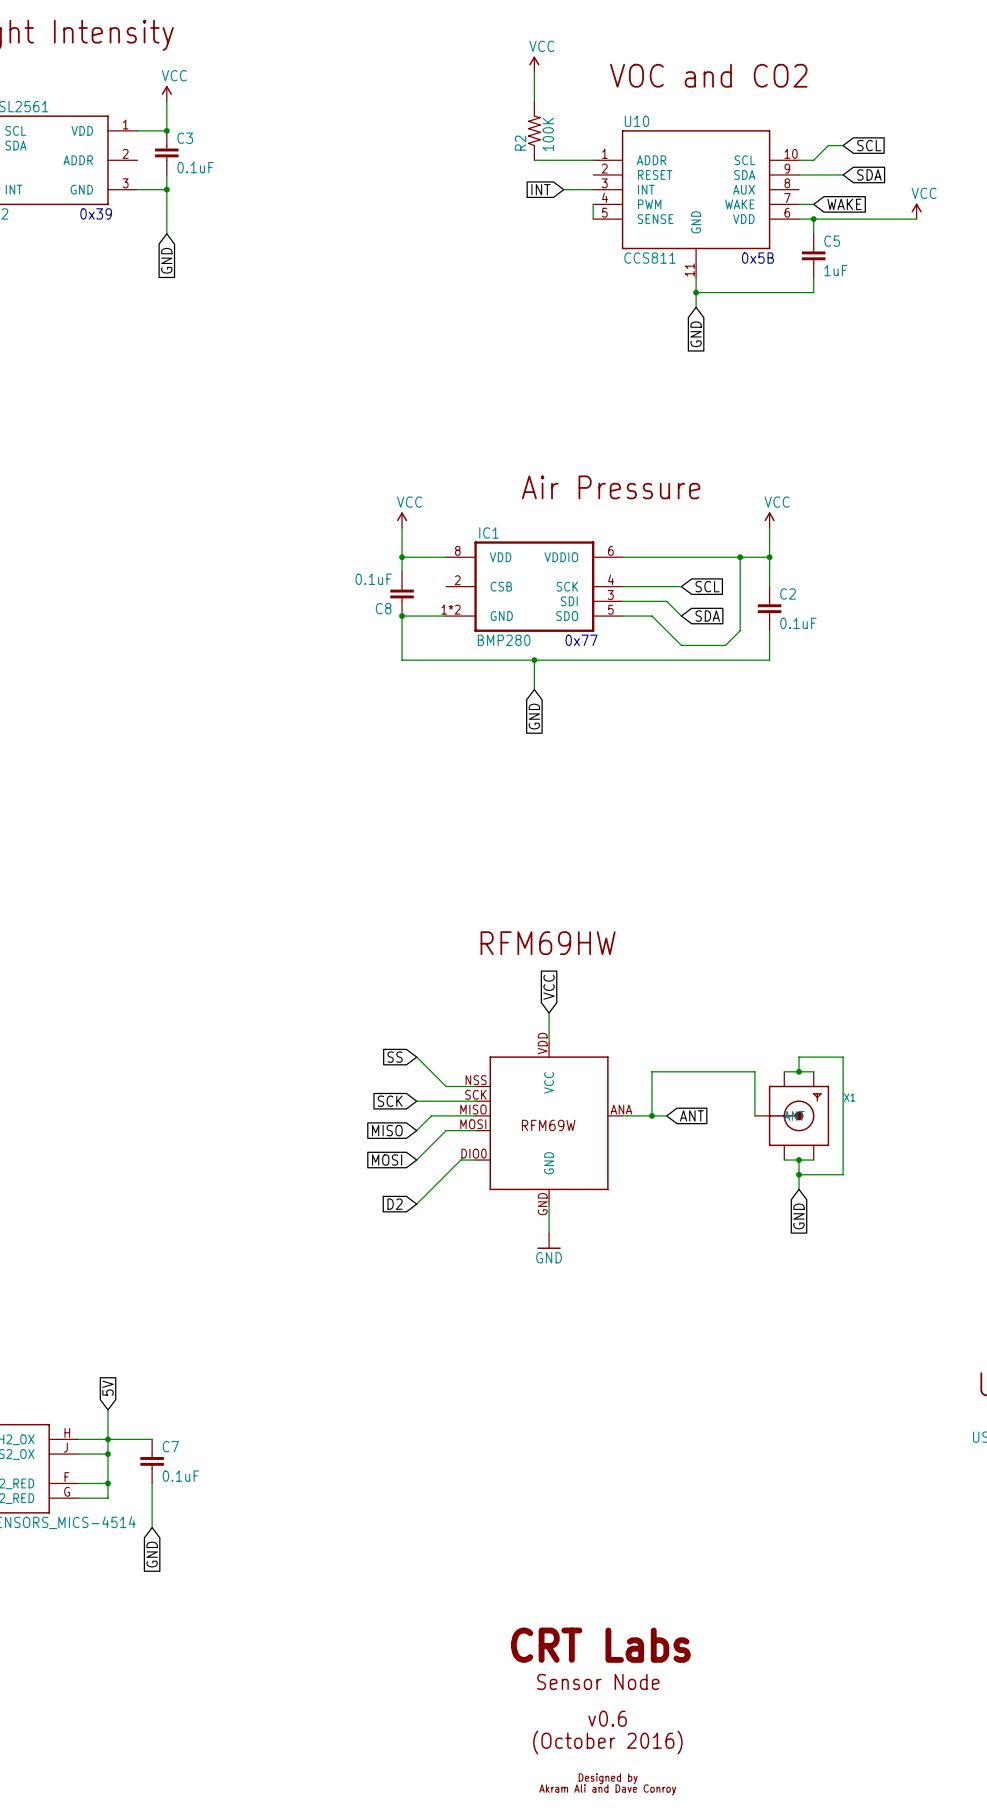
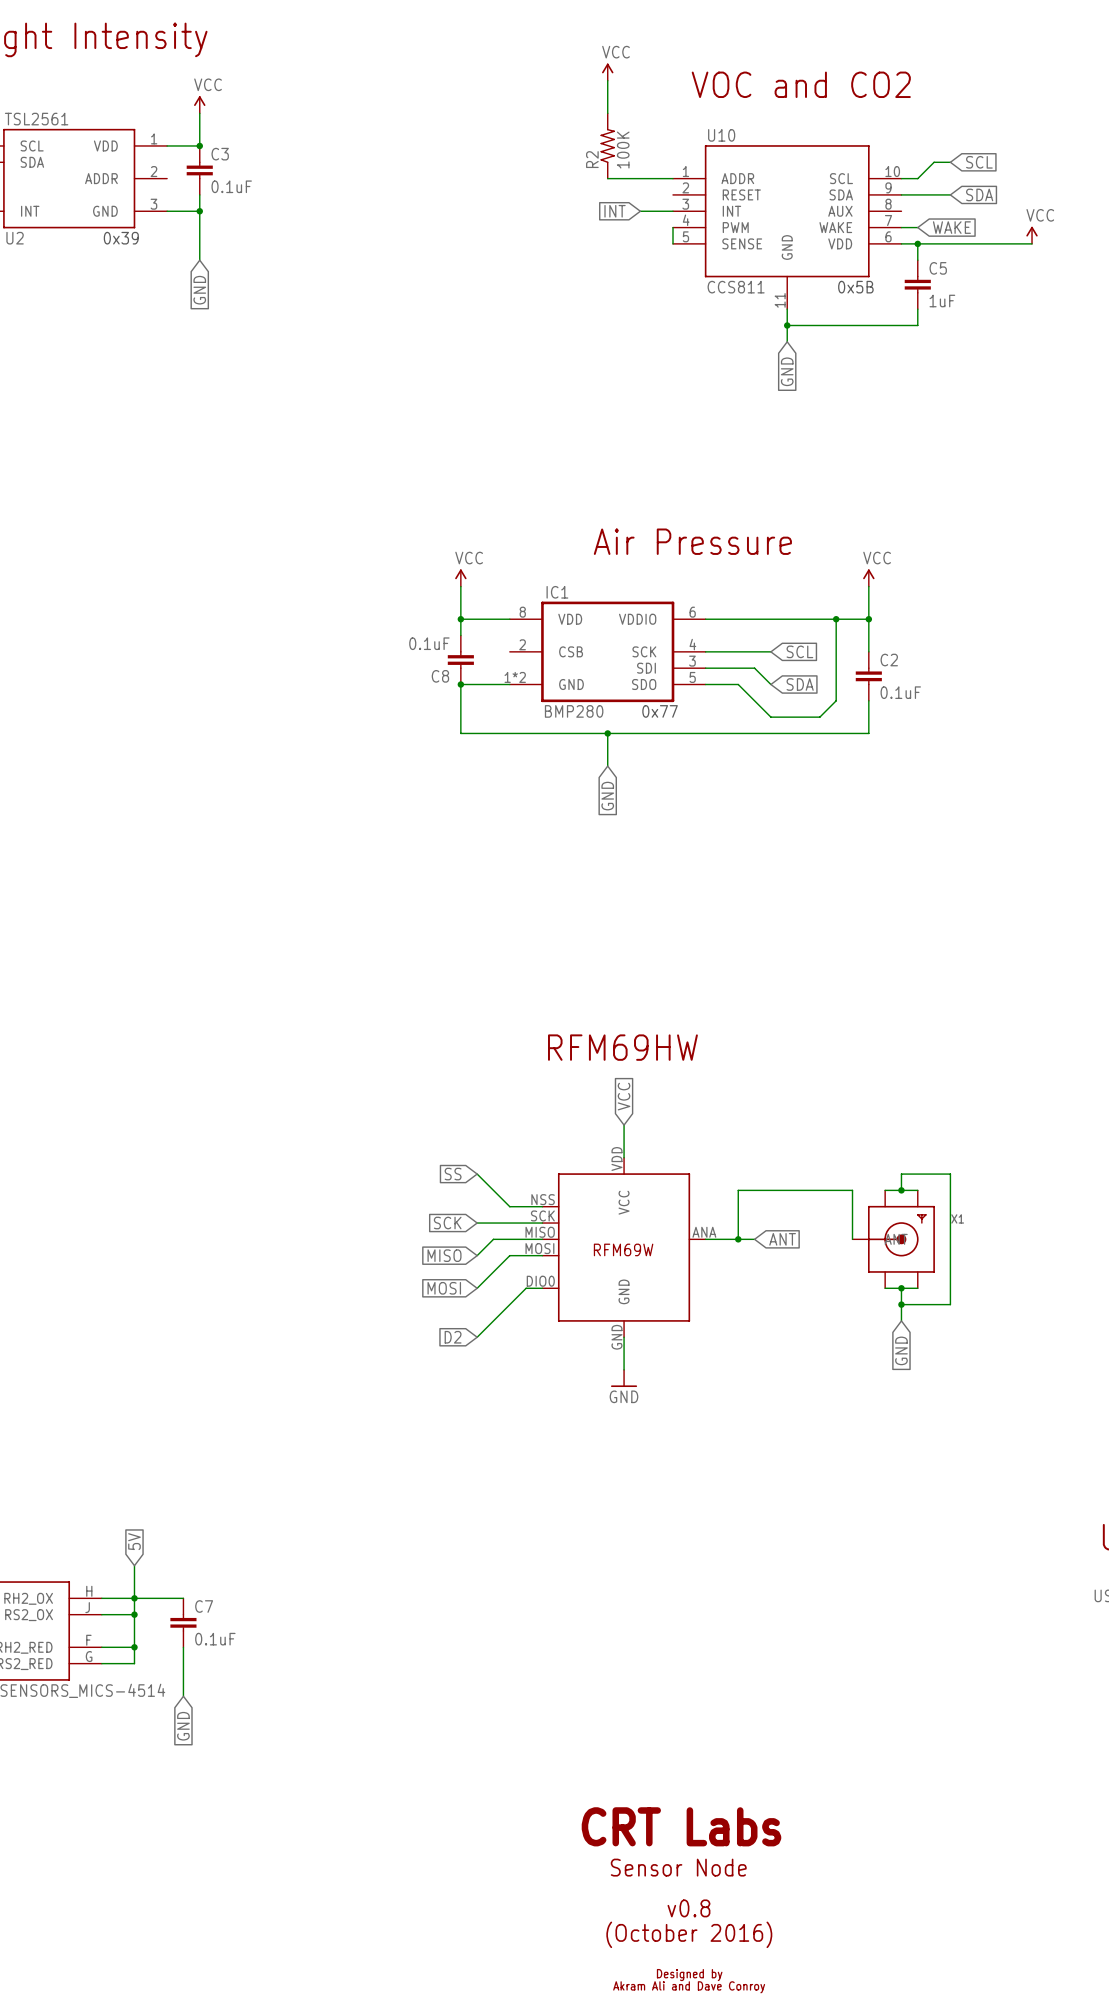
text: v0.6 (607, 1718) -> v0.8 (688, 1908)

